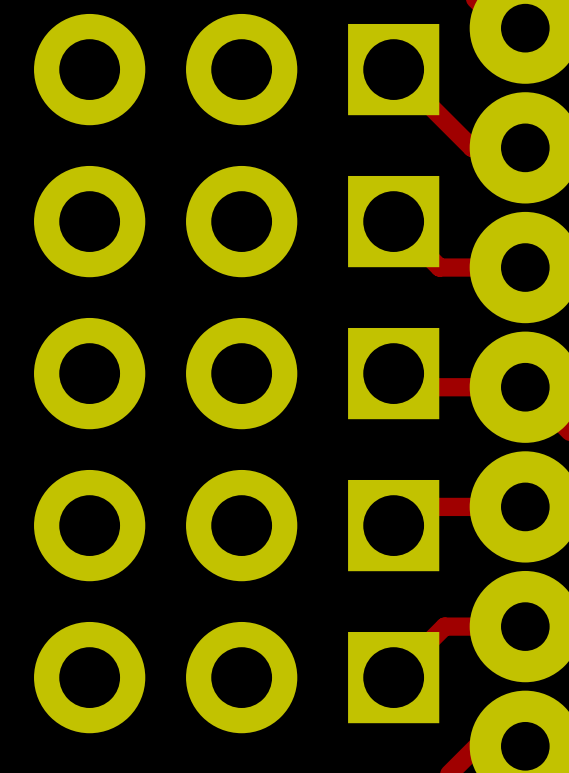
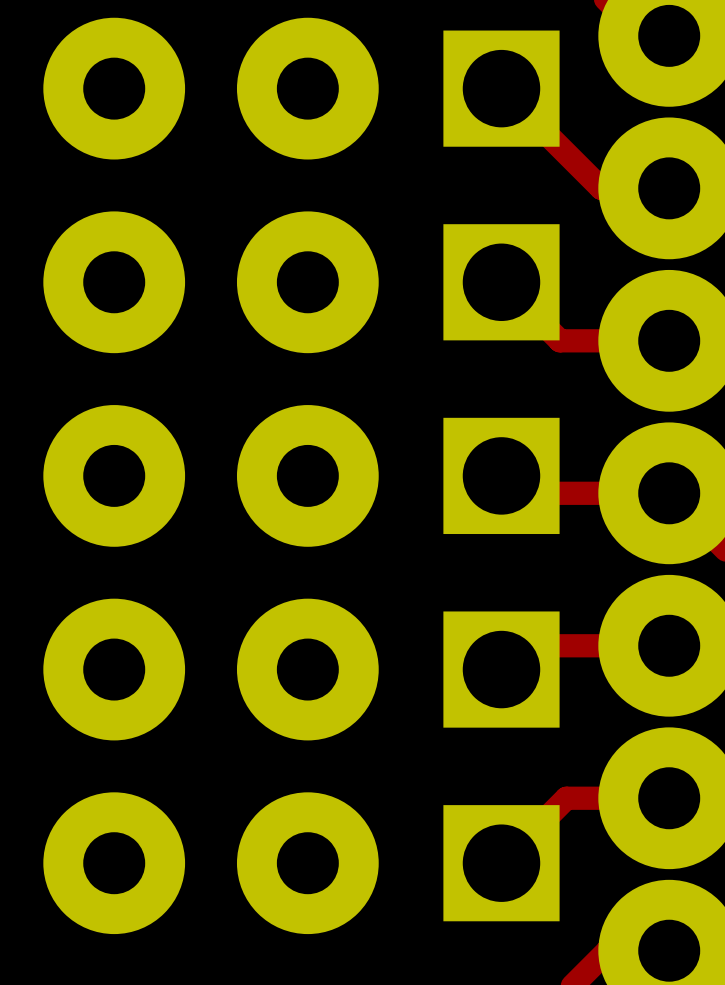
part footprint: [34, 13, 146, 126] -> [43, 17, 186, 160]
part footprint: [186, 13, 298, 126] -> [236, 17, 379, 160]
part footprint: [34, 165, 146, 278] -> [43, 211, 186, 354]
part footprint: [186, 165, 298, 278] -> [236, 211, 379, 354]
part footprint: [34, 317, 146, 430] -> [43, 405, 186, 547]
part footprint: [186, 317, 298, 430] -> [236, 405, 379, 547]
part footprint: [34, 469, 146, 582] -> [43, 598, 186, 741]
part footprint: [186, 469, 298, 582] -> [236, 598, 379, 741]
part footprint: [34, 621, 146, 734] -> [43, 792, 186, 935]
part footprint: [186, 621, 298, 734] -> [236, 792, 379, 935]

